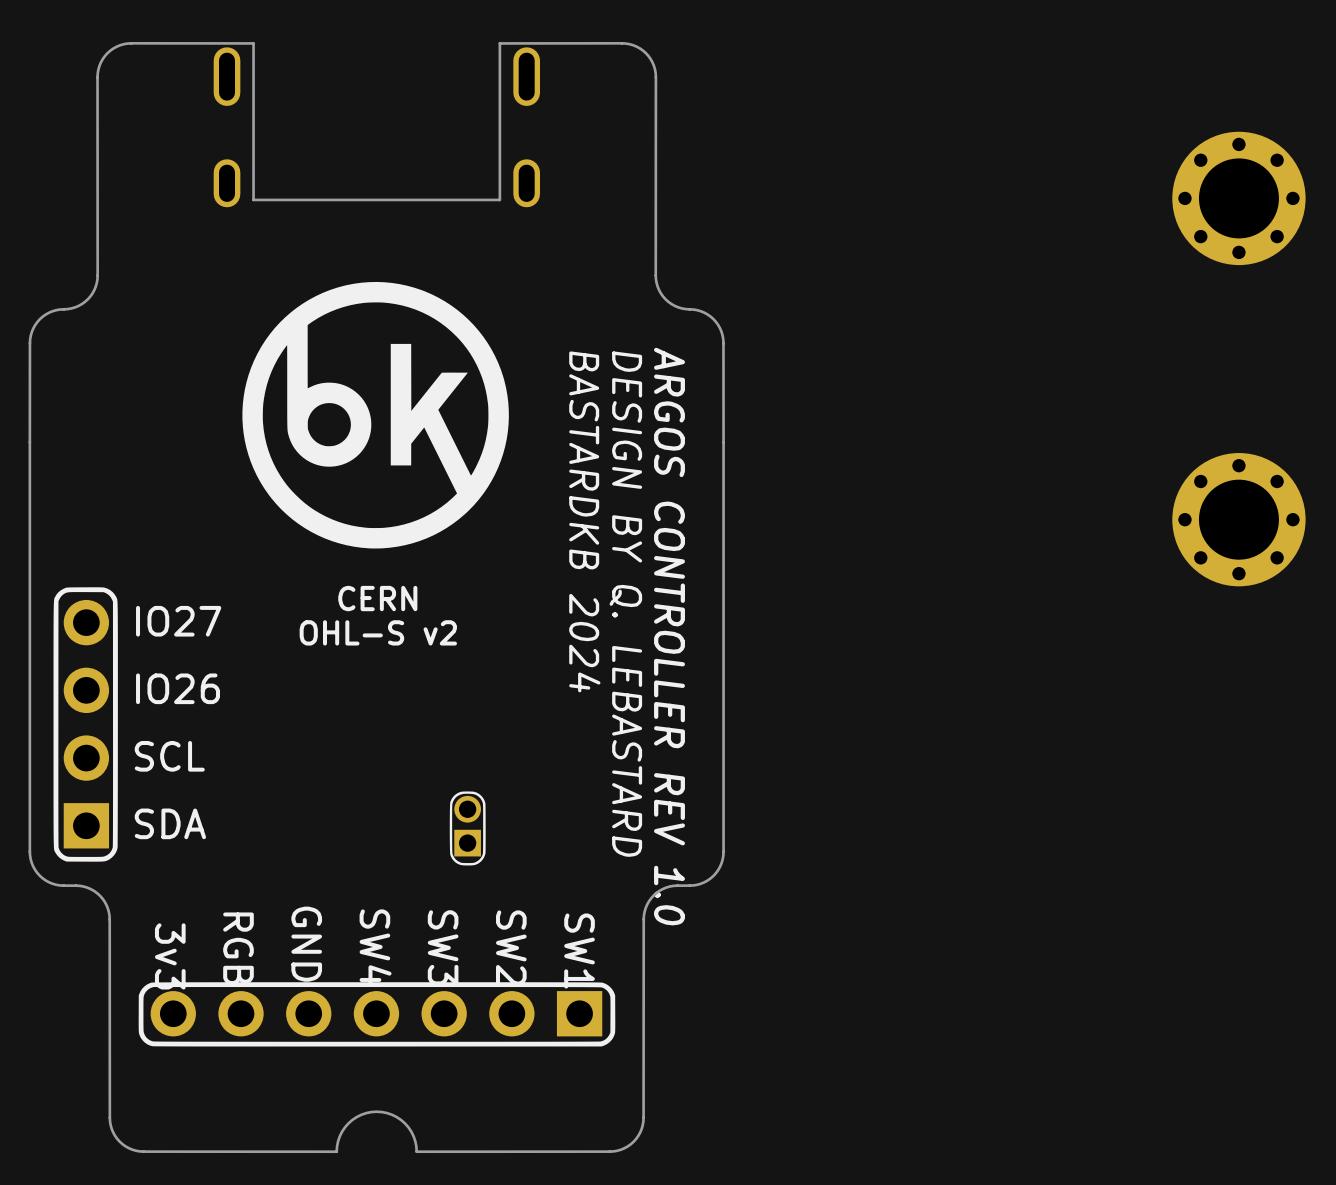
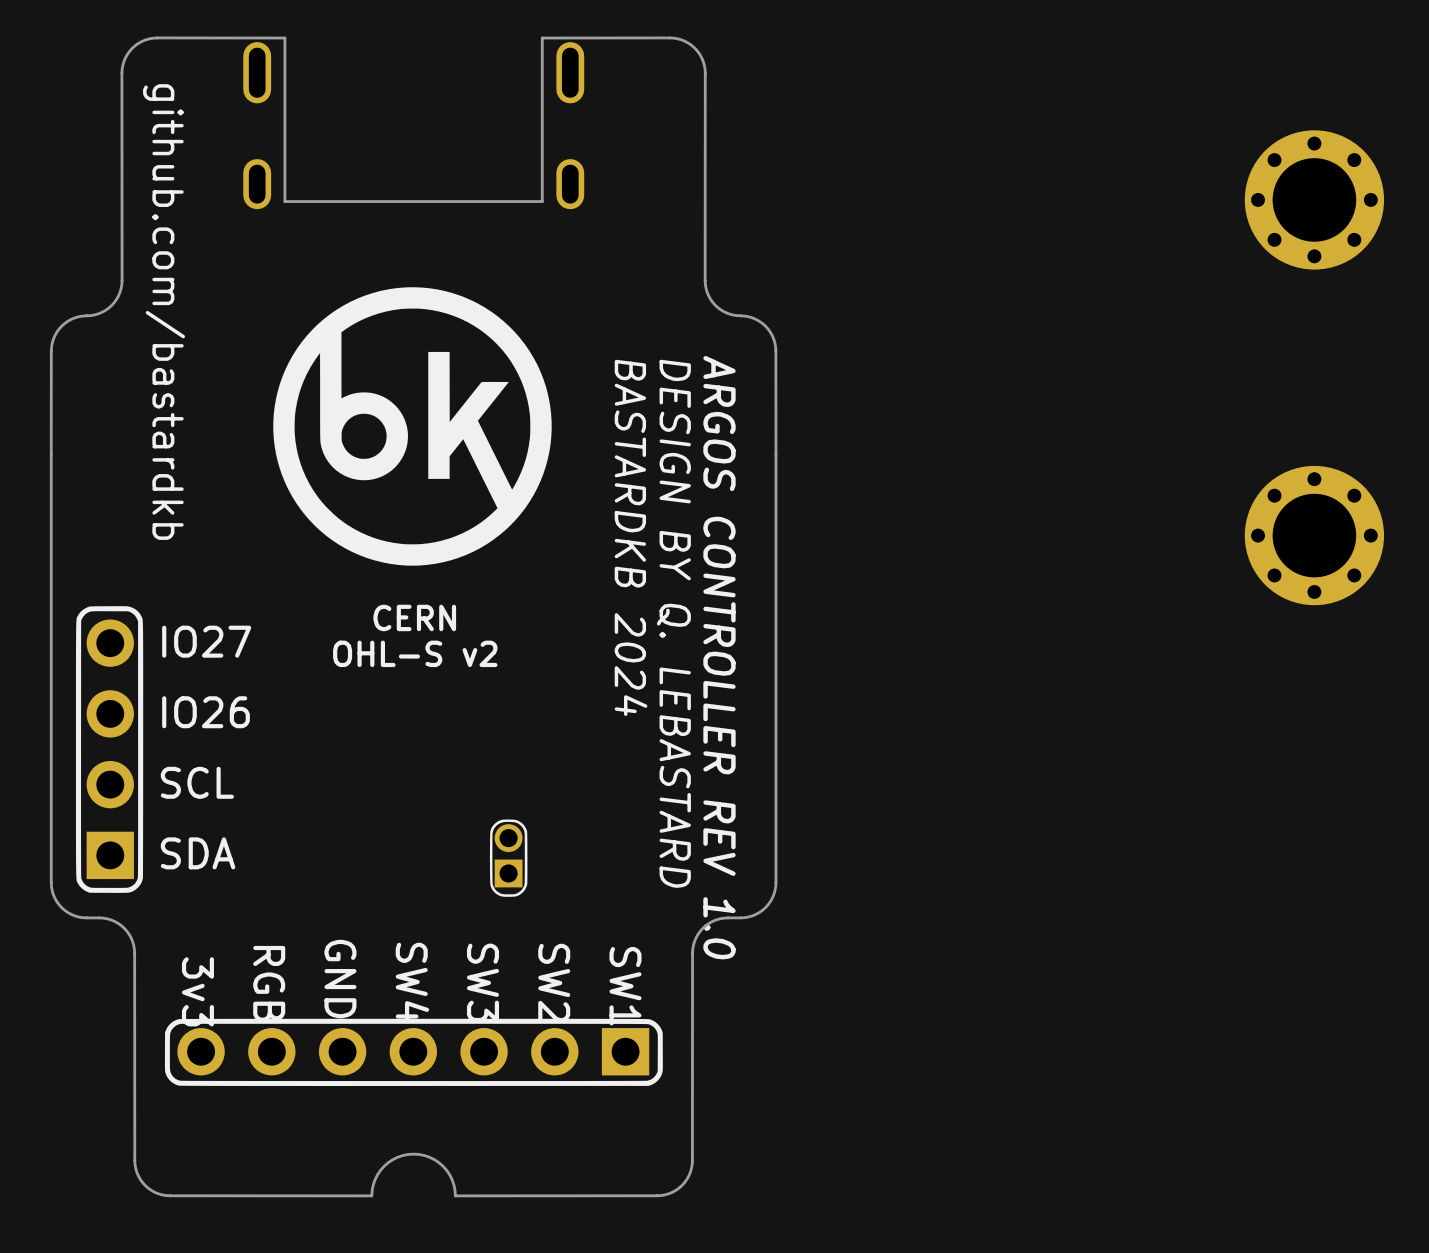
text: none -> github.com/bastardkb (164, 312)

